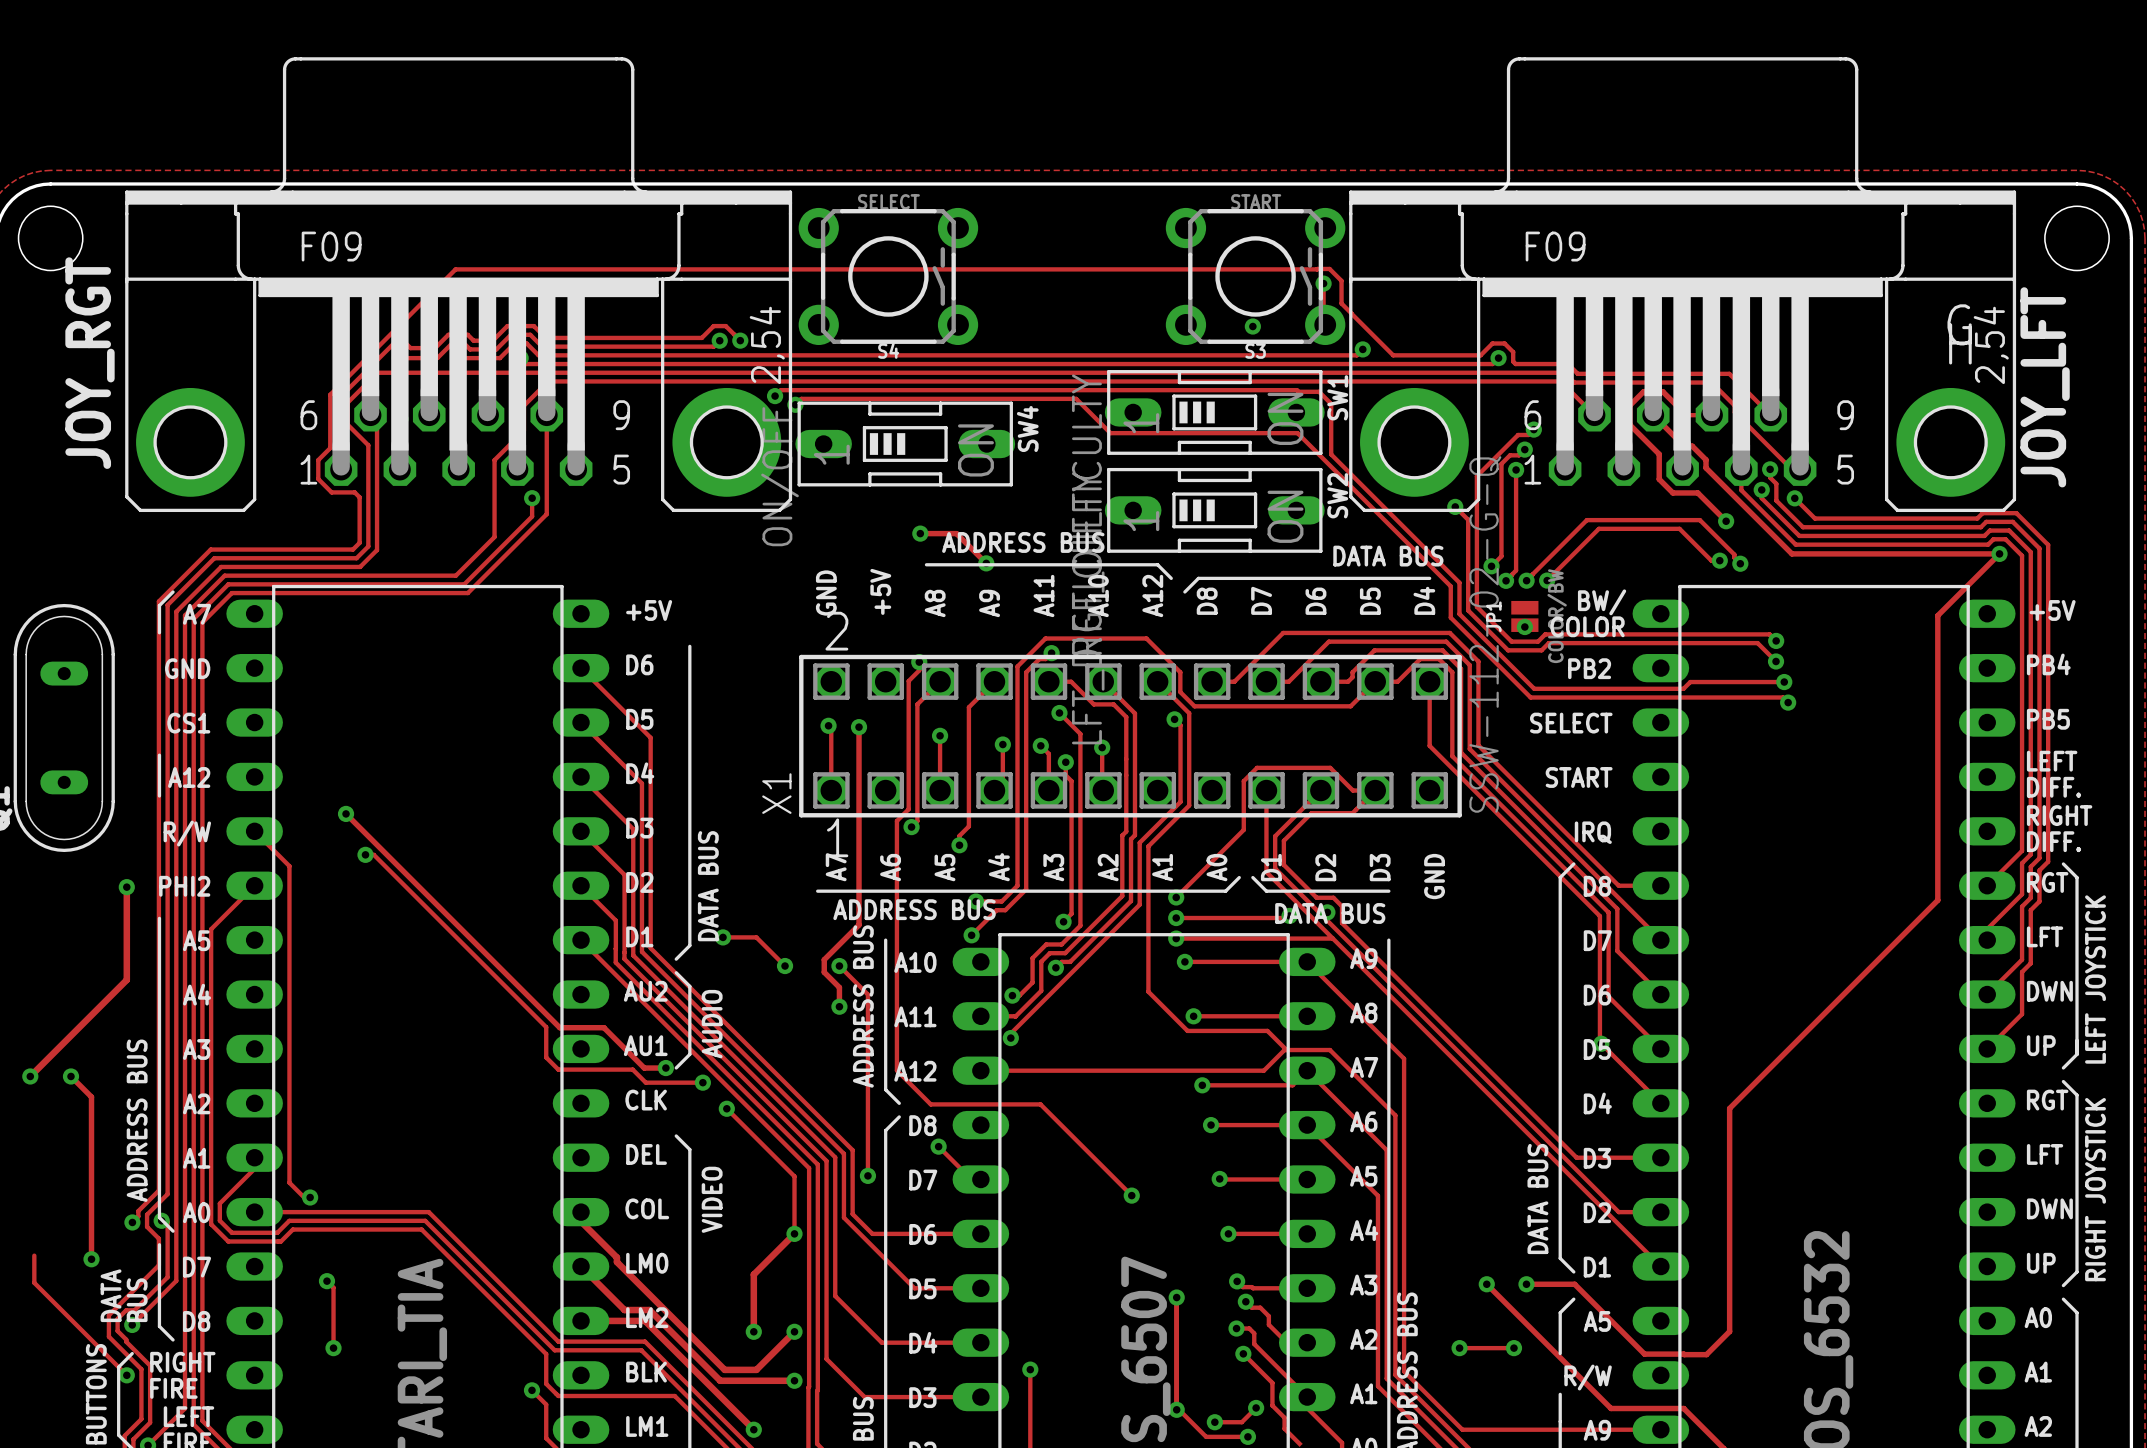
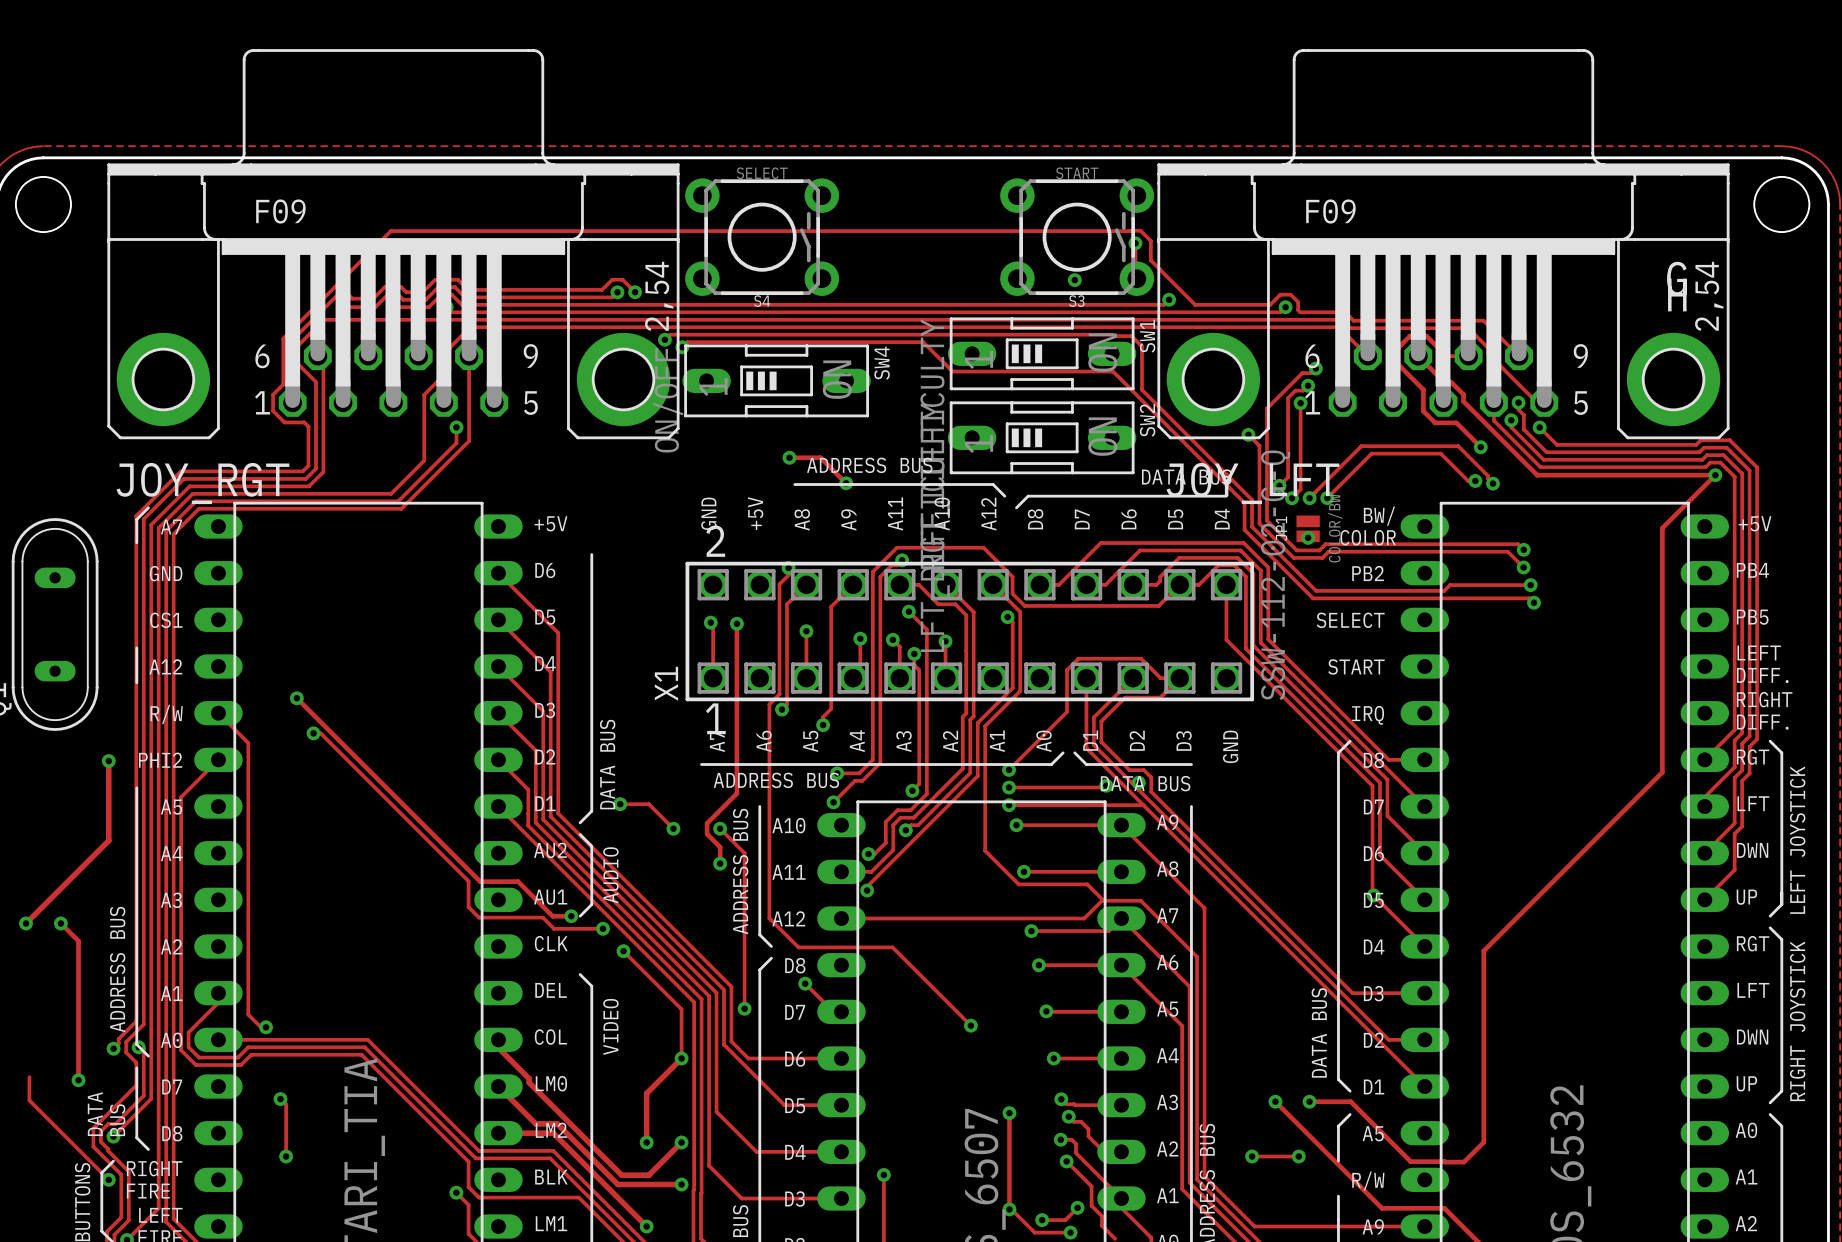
JOY_RGT name rotation: 0° (89, 363) -> 90° clockwise (202, 483)
JOY_RGT name position: JOY_RGT (89, 363) -> JOY_RGT (202, 483)
JOY_LFT name rotation: 0° (2045, 387) -> 90° clockwise (1252, 483)
JOY_LFT name position: JOY_LFT (2045, 387) -> JOY_LFT (1252, 483)

